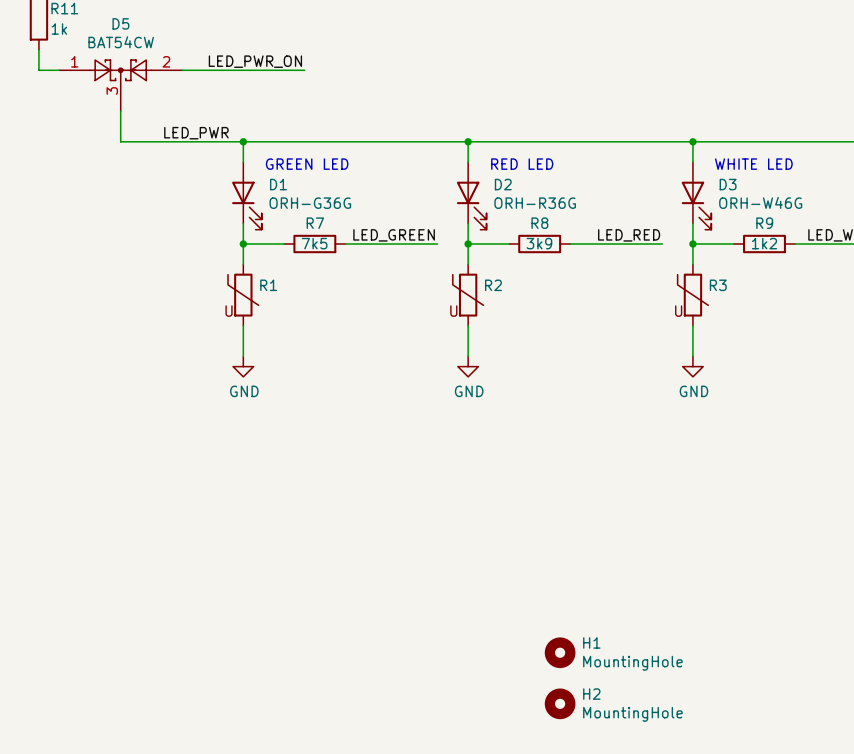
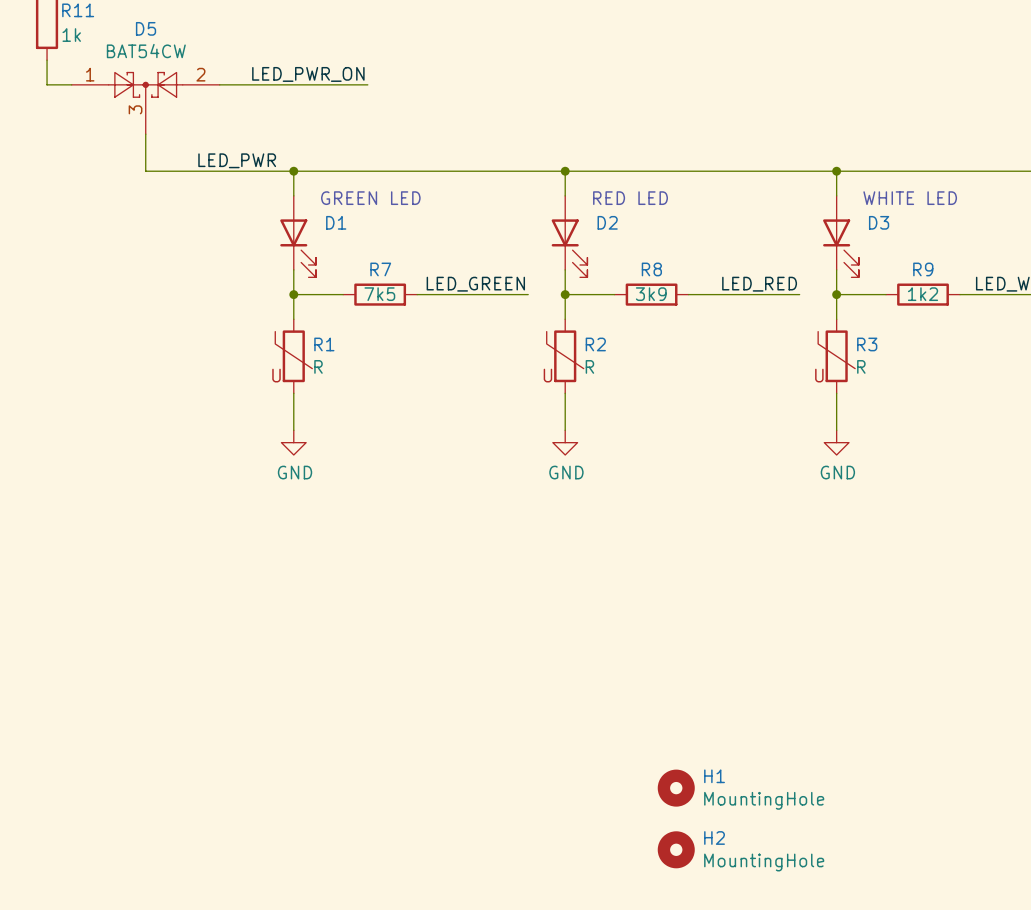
D3 value: ORH-W46G (760, 202) -> none
D1 value: ORH-G36G (310, 203) -> none
D2 value: ORH-R36G (535, 203) -> none
R1 value: none -> R (318, 366)
R2 value: none -> R (589, 366)
R3 value: none -> R (861, 366)

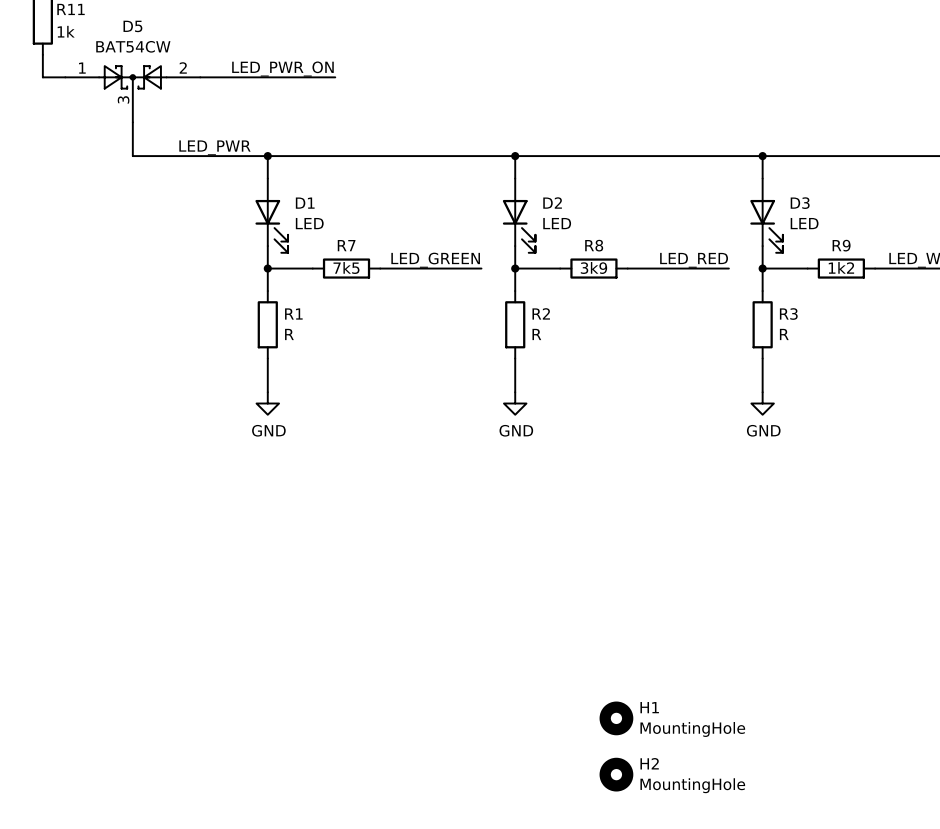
text: GREEN LED (370, 198) -> none
text: RED LED (630, 198) -> none
text: WHITE LED (910, 198) -> none
D1 value: none -> LED (309, 223)
D2 value: none -> LED (557, 223)
D3 value: none -> LED (804, 223)
R1 symbol: [275, 319, 313, 394] -> [257, 291, 278, 359]
R2 symbol: [546, 319, 584, 394] -> [505, 291, 526, 359]
R3 symbol: [818, 319, 856, 394] -> [752, 291, 773, 359]

